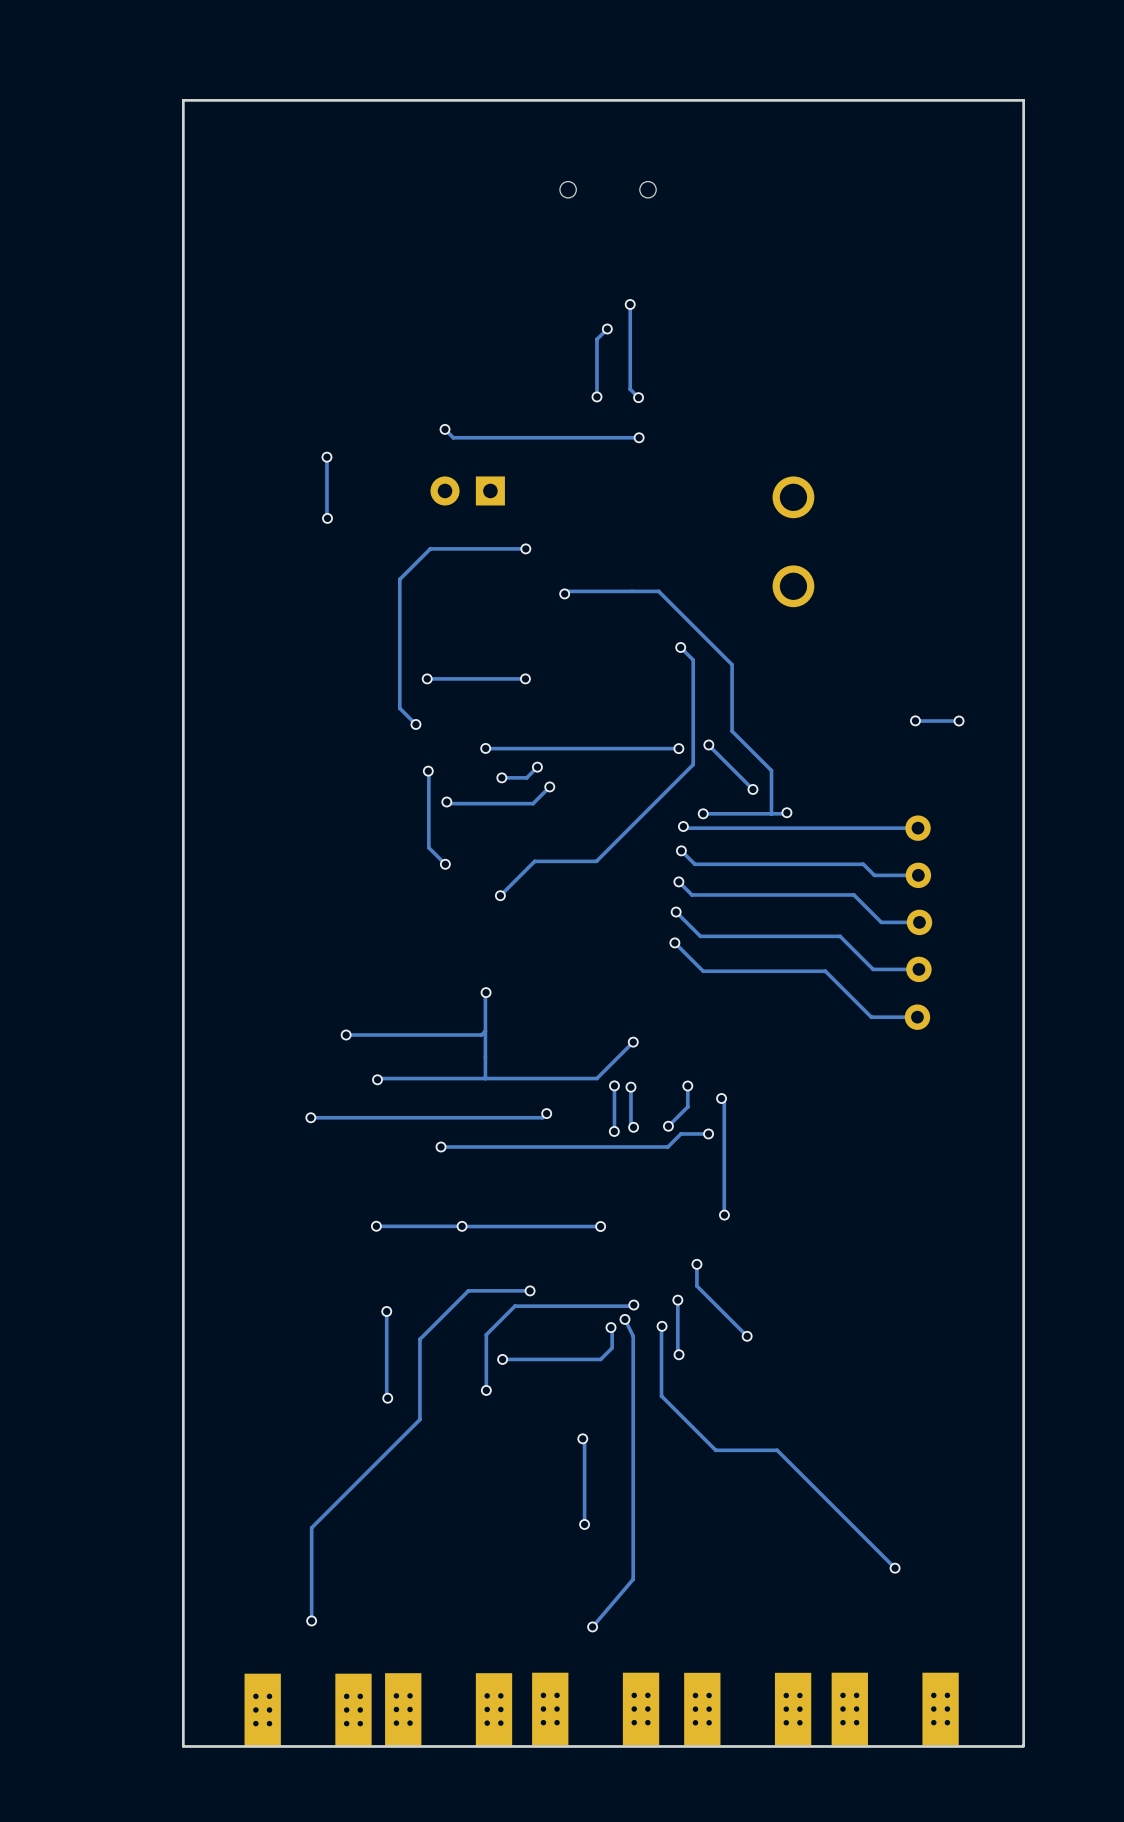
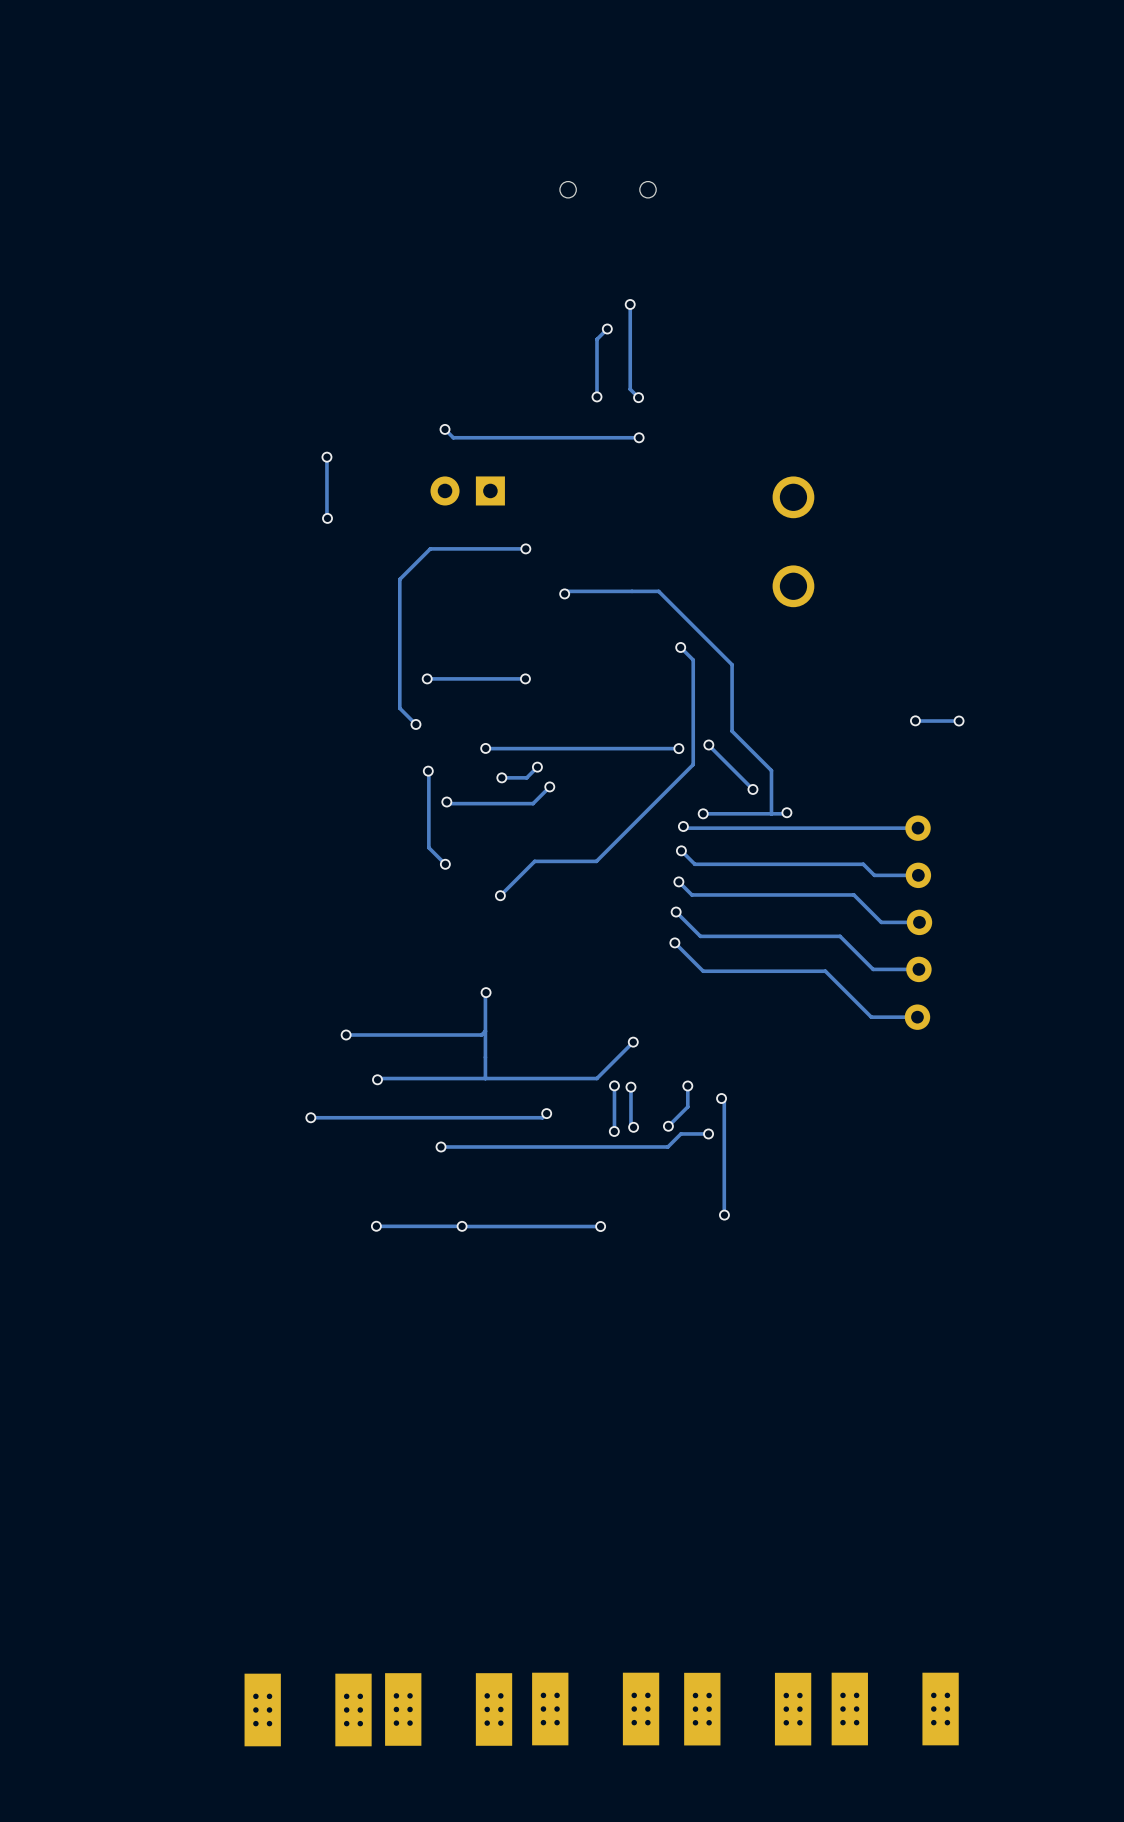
track: (696, 1264) (696, 1286) (747, 1336) -> none
via: (696, 1264) -> none
track: (530, 1290) (468, 1290) (419, 1339) (419, 1419) (311, 1527) (311, 1620) -> none
via: (530, 1290) -> none
track: (677, 1300) (679, 1354) -> none
via: (677, 1300) -> none
track: (633, 1305) (514, 1306) (486, 1334) (486, 1390) -> none
via: (633, 1305) -> none
track: (386, 1311) (387, 1398) -> none
via: (386, 1311) -> none
track: (624, 1319) (633, 1336) (633, 1579) (592, 1626) -> none
via: (624, 1319) -> none
track: (662, 1326) (661, 1396) (715, 1450) (777, 1450) (895, 1568) -> none
via: (662, 1326) -> none
track: (611, 1327) (612, 1348) (600, 1359) (502, 1359) -> none
via: (611, 1327) -> none
via: (747, 1336) -> none
via: (679, 1354) -> none
via: (502, 1359) -> none
via: (486, 1390) -> none
via: (387, 1398) -> none
track: (582, 1438) (584, 1440) (584, 1524) -> none
via: (582, 1438) -> none
via: (584, 1524) -> none
via: (895, 1568) -> none
via: (311, 1620) -> none
via: (592, 1626) -> none
board edge: (1023, 1745) (1023, 100) (183, 100) (183, 1746) -> none
board edge: (1023, 1746) (183, 1746) -> none

